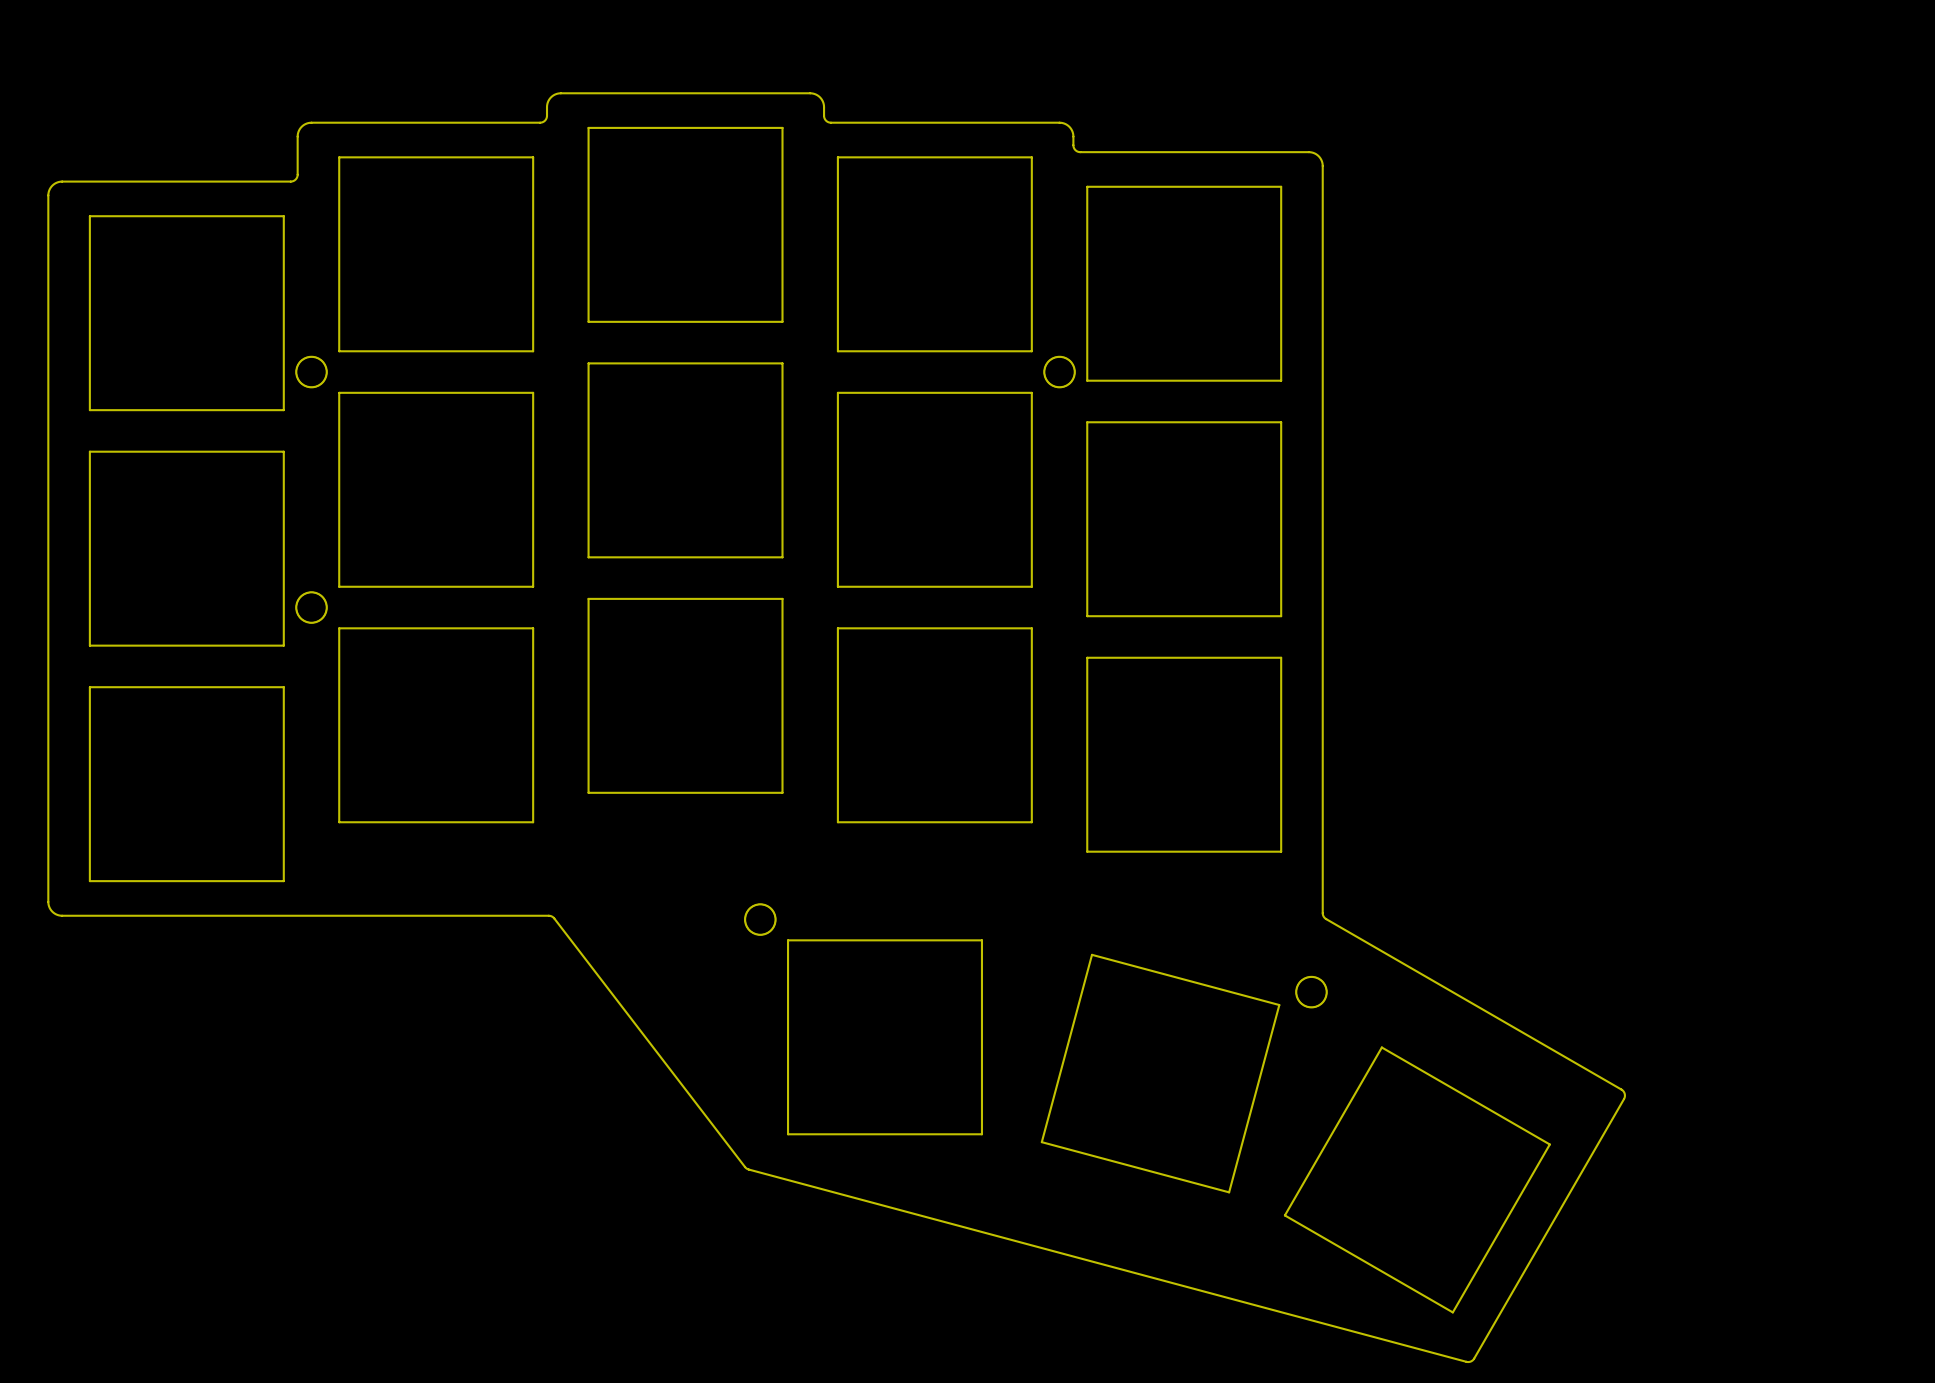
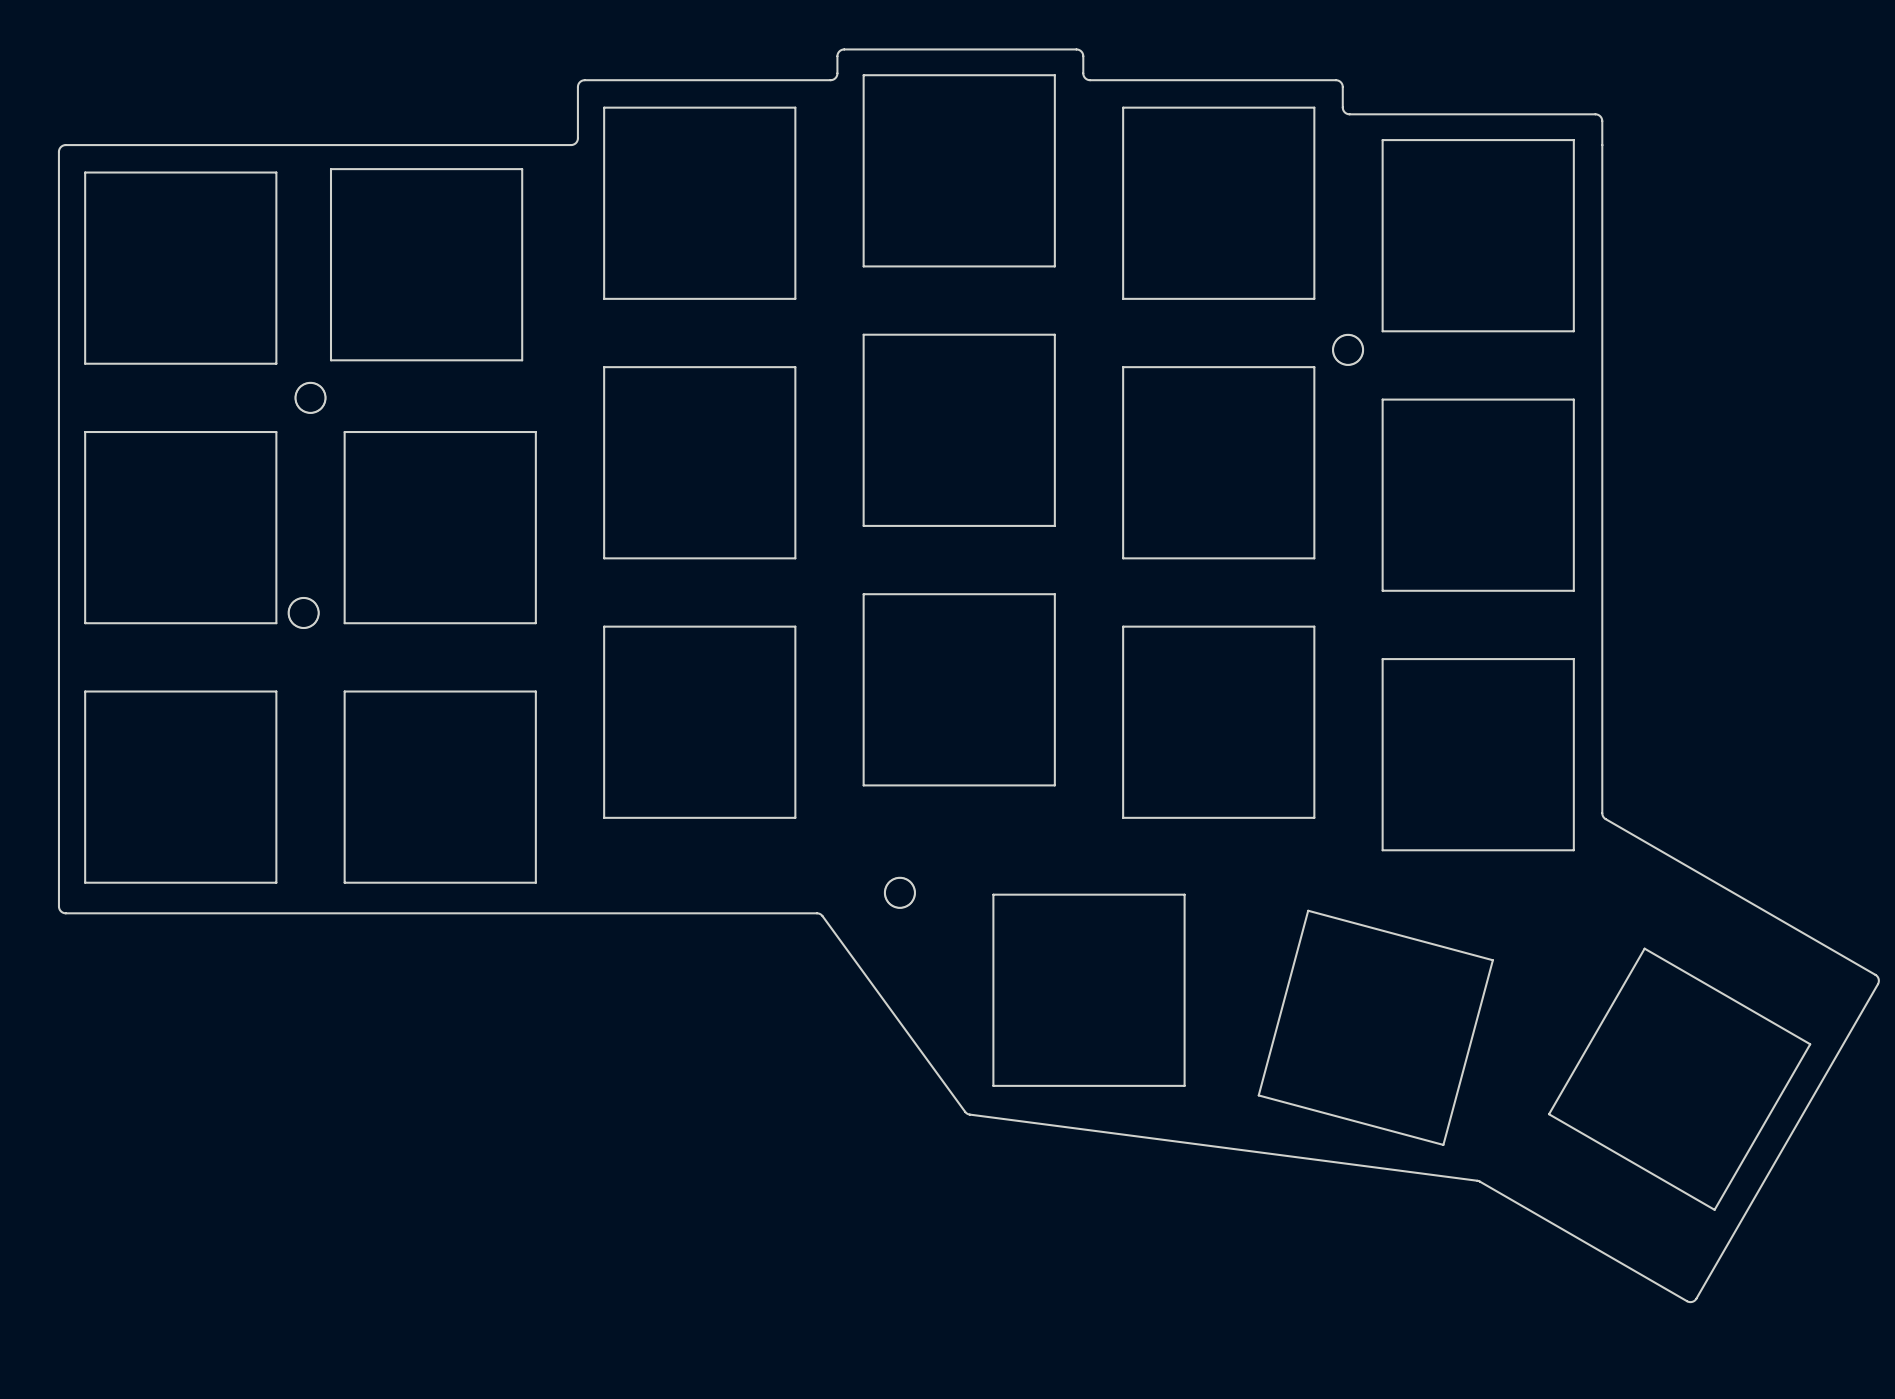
board edge: (588, 127) (588, 321) (782, 321) (782, 127) (588, 127) -> (604, 107) (604, 298) (795, 298) (795, 107) (604, 107)
board edge: none -> (1382, 140) (1382, 331) (1573, 331) (1573, 140) (1382, 140)
board edge: none -> (1602, 145) (1602, 120) (1596, 114) (1348, 114) (1342, 109) (1342, 84) (1336, 80) (1089, 80) (1083, 75) (1083, 54) (1077, 49) (844, 49) (838, 53) (837, 74) (831, 80) (582, 80) (577, 86) (577, 139) (571, 145) (62, 145) (58, 151) (59, 909) (65, 913) (818, 913) (822, 916) (967, 1114) (1478, 1180) (1687, 1301) (1693, 1301) (1878, 979) (1875, 974) (1605, 819) (1602, 814) (1602, 145)
board edge: (1073, 136) (1069, 126) (1061, 122) (830, 122) (824, 118) (821, 99) (811, 93) (560, 93) (554, 94) (549, 99) (546, 118) (540, 122) (306, 123) (301, 126) (298, 133) (297, 175) (291, 181) (62, 181) (53, 184) (48, 195) (49, 906) (54, 913) (62, 915) (551, 916) (747, 1168) (1469, 1361) (1474, 1358) (1624, 1094) (1621, 1089) (1326, 919) (1322, 914) (1321, 161) (1317, 155) (1310, 152) (1080, 152) (1075, 150) (1073, 145) -> (1054, 148) (1054, 75) (863, 75) (863, 266) (1054, 266) (1054, 157)
board edge: (837, 157) (837, 351) (1031, 351) (1031, 157) (837, 157) -> none
board edge: (1087, 186) (1087, 380) (1281, 380) (1281, 186) (1087, 186) -> (1123, 107) (1123, 298) (1314, 298) (1314, 107) (1123, 107)
board edge: (89, 216) (283, 216) -> (85, 227) (85, 172) (276, 172) (276, 227)
round board edge: none -> [1332, 333, 1365, 366]
board edge: (89, 354) (89, 410) (283, 410) (283, 354) -> (85, 363) (276, 363)
round board edge: [1043, 355, 1076, 389] -> none
board edge: (588, 363) (588, 557) (782, 557) (782, 363) (588, 363) -> (604, 367) (604, 558) (795, 558) (795, 367) (604, 367)
round board edge position: (311, 372) -> (310, 397)
board edge: none -> (1382, 399) (1382, 590) (1573, 590) (1573, 399) (1382, 399)
board edge: (339, 392) (339, 586) (533, 586) (533, 392) (339, 392) -> (344, 432) (344, 623) (535, 623) (535, 432) (344, 432)
board edge: (837, 392) (837, 586) (1031, 586) (1031, 392) (837, 392) -> (863, 334) (863, 525) (1054, 525) (1054, 334) (863, 334)
board edge: (1087, 422) (1281, 422) (1281, 616) (1087, 616) (1087, 422) -> (1123, 367) (1314, 367) (1314, 558) (1123, 558) (1123, 367)
board edge: (89, 451) (283, 451) -> (85, 459) (85, 432) (276, 432) (276, 459)
board edge: (588, 598) (588, 792) (782, 792) (782, 598) (588, 598) -> (604, 626) (604, 817) (795, 817) (795, 626) (604, 626)
board edge: (89, 617) (89, 645) (283, 645) (283, 617) -> (85, 623) (276, 623)
board edge: (339, 628) (533, 628) (533, 822) (339, 822) (339, 628) -> (344, 691) (535, 691) (535, 882) (344, 882) (344, 691)
board edge: (837, 628) (837, 822) (1031, 822) (1031, 628) (837, 628) -> (863, 594) (863, 785) (1054, 785) (1054, 594) (863, 594)
board edge: none -> (1382, 659) (1573, 659) (1573, 850) (1382, 850) (1382, 659)
board edge: (1087, 657) (1281, 657) (1281, 851) (1087, 851) (1087, 657) -> (1123, 626) (1314, 626) (1314, 817) (1123, 817) (1123, 626)
round board edge position: (760, 919) -> (899, 892)
board edge: (788, 940) (788, 1134) (981, 1134) (981, 940) (788, 940) -> (993, 894) (993, 1085) (1184, 1085) (1184, 894) (993, 894)
board edge: (1092, 954) (1279, 1005) (1229, 1192) (1041, 1142) (1092, 954) -> (1308, 910) (1492, 960) (1443, 1144) (1258, 1095) (1308, 910)
round board edge: [1295, 975, 1328, 1009] -> none
board edge: (1381, 1047) (1284, 1215) (1452, 1312) (1549, 1144) (1381, 1047) -> (1644, 948) (1549, 1114) (1714, 1209) (1810, 1044) (1644, 948)

